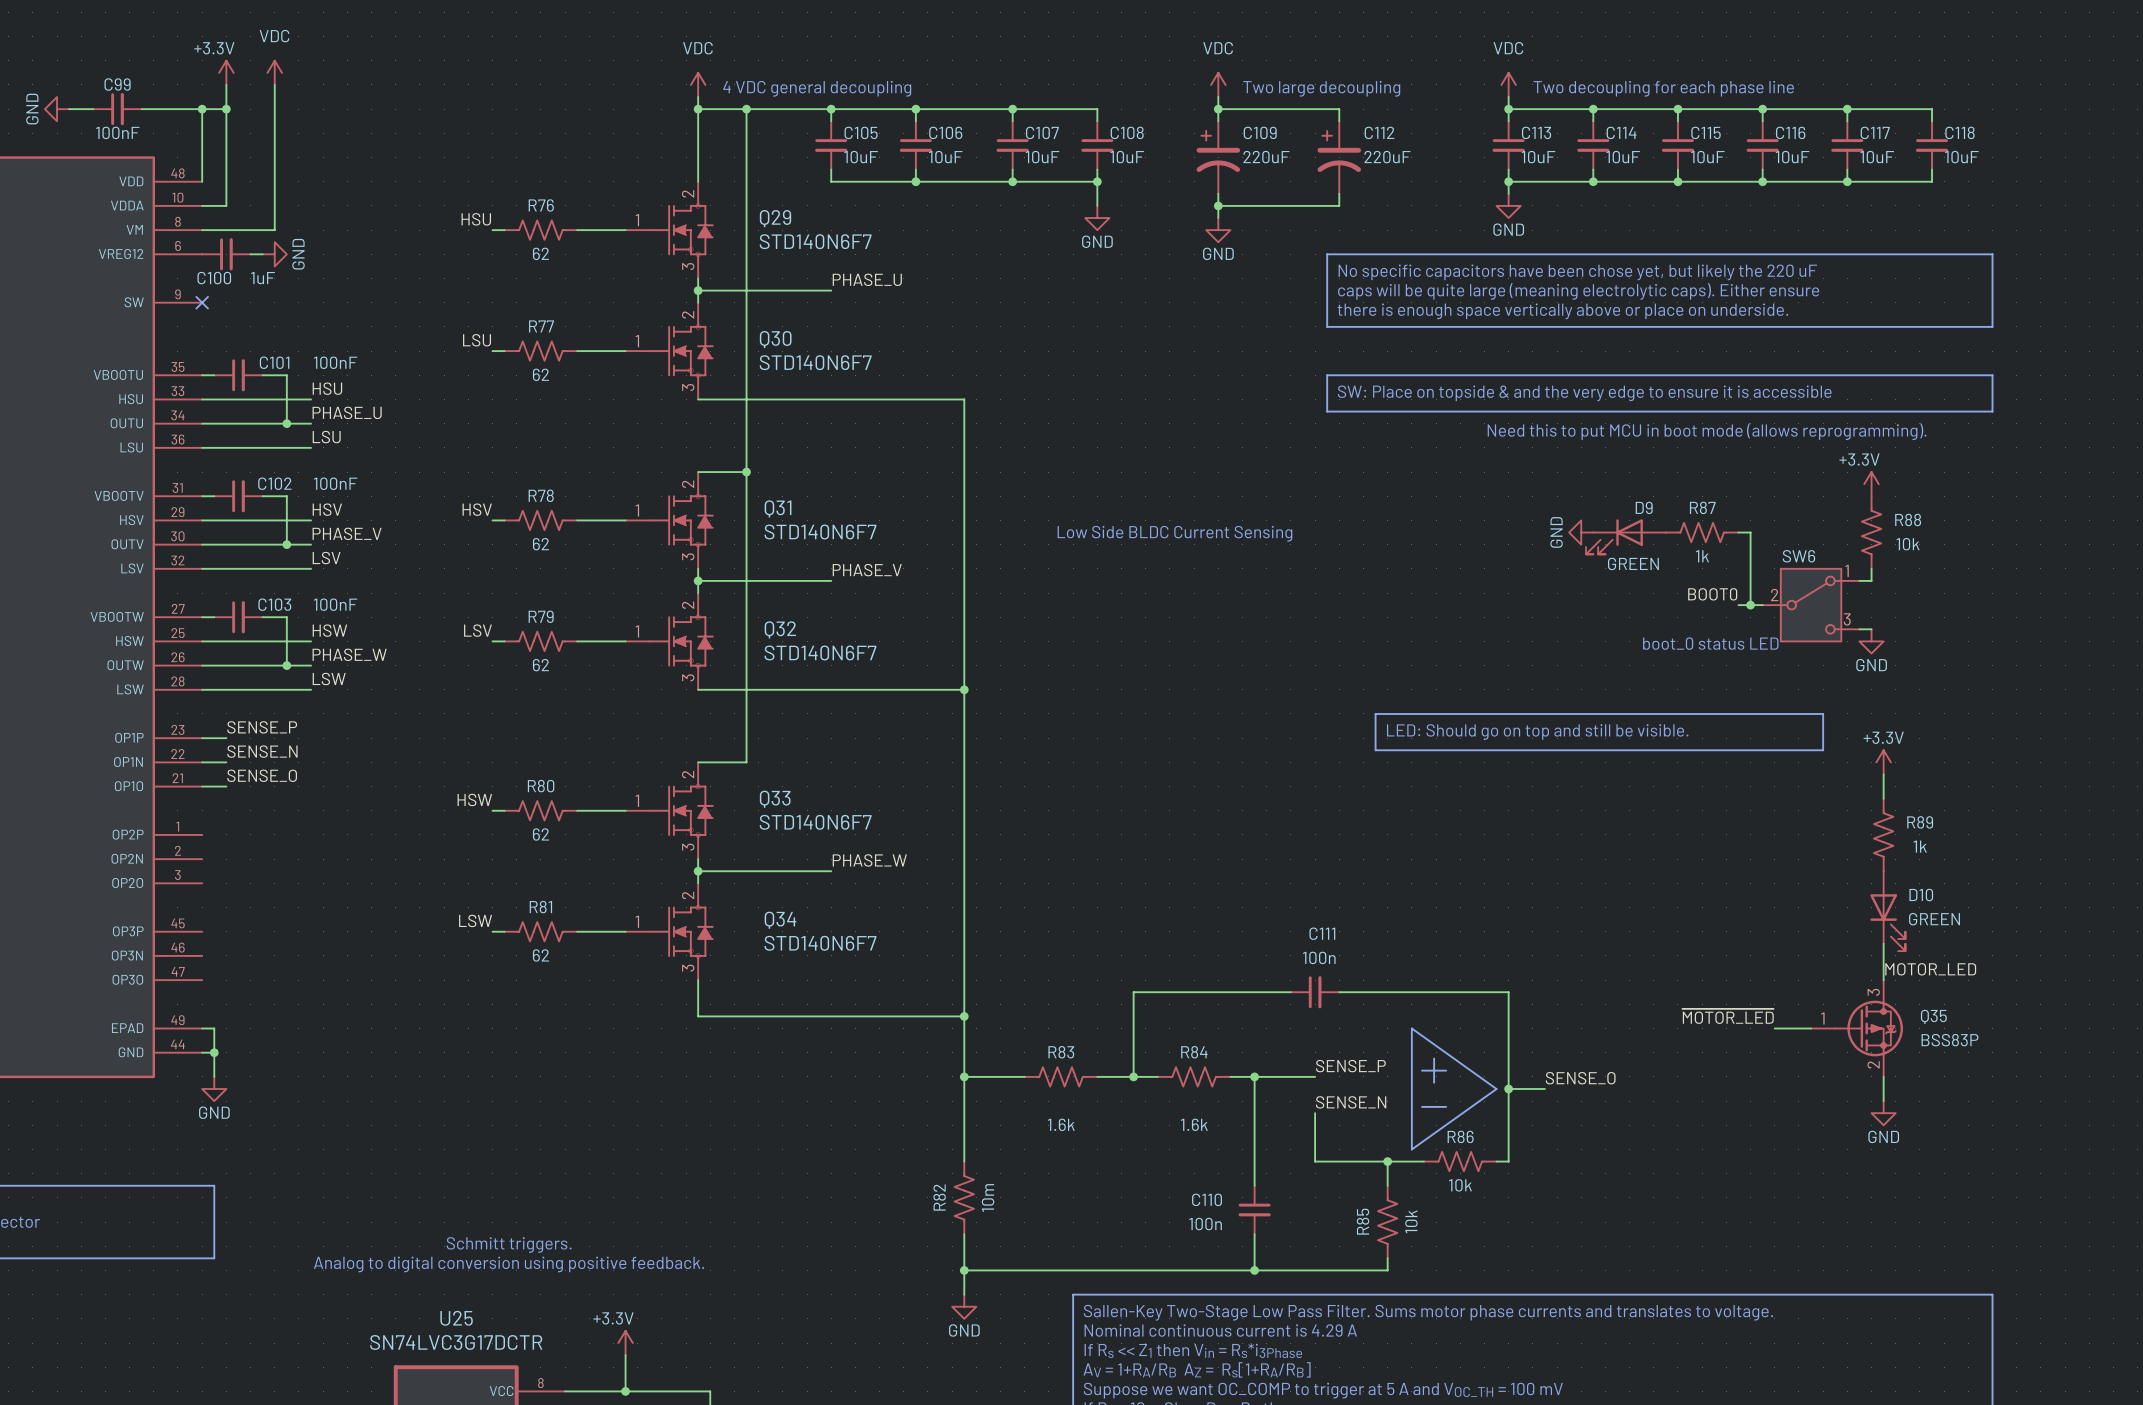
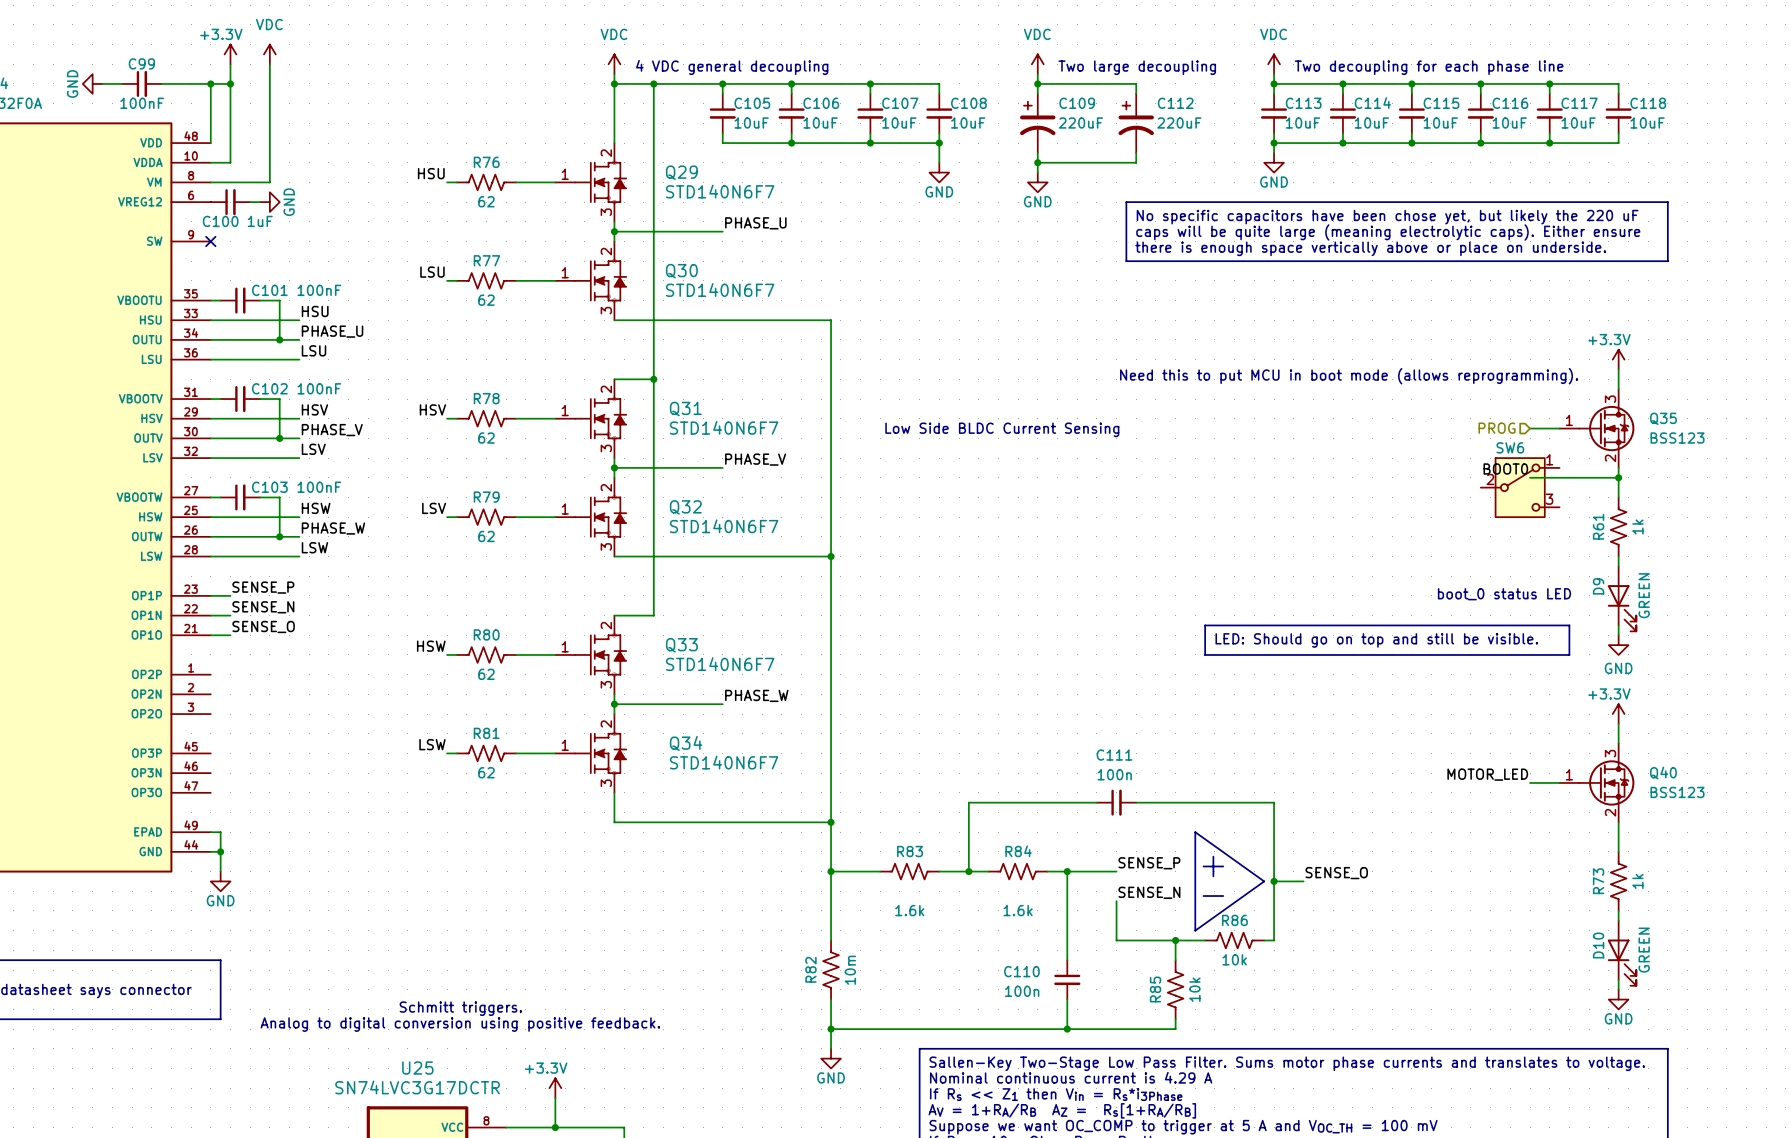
line: (1327, 375) (1992, 375) (1992, 411) (1327, 411) (1327, 375) -> none
text: SW: Place on topside & and the very edge to ensure it is accessible (1584, 393) -> none
text position: Need this to put MCU in boot mode (allows reprogramming). (1707, 431) -> Need this to put MCU in boot mode (allows reprogramming). (1349, 376)
wire: none -> (1618, 369) (1618, 389)
power symbol position: +3.3V (1871, 484) -> +3.3V (1618, 359)
power symbol: GND (1581, 532) -> none
R87: 1k (1702, 532) -> none
wire: (1738, 532) (1750, 532) (1750, 605) -> none
hierarchical label: none -> PROG (1497, 428)
wire: none -> (1530, 428) (1559, 428)
R88: 10k (1871, 532) -> none
D9 rotation: 0° (1614, 536) -> 90° counterclockwise (1622, 608)
D9 position: (1625, 536) -> (1622, 598)
wire: (1871, 568) (1871, 580) (1859, 580) -> none
wire: none -> (1618, 467) (1618, 497)
wire: none -> (1530, 477) (1618, 477)
junction: none -> (1618, 477)
label position: BOOT0 (1712, 594) -> BOOT0 (1505, 468)
wire: (1738, 605) (1762, 605) -> none
junction: (1750, 605) -> none
wire: (1859, 629) (1871, 629) -> none
power symbol: GND (1871, 641) -> none
text position: boot_0 status LED (1710, 643) -> boot_0 status LED (1504, 594)
R61: none -> 1k (1618, 527)
wire: none -> (1618, 556) (1618, 566)
line: (1375, 713) (1823, 713) (1823, 750) (1375, 750) (1375, 713) -> (1205, 625) (1569, 625) (1569, 654) (1205, 654) (1205, 625)
text position: LED: Should go on top and still be visible. (1537, 732) -> LED: Should go on top and still be visible. (1376, 640)
power symbol text position: +3.3V (1883, 737) -> +3.3V (1609, 693)
power symbol position: +3.3V (1883, 762) -> +3.3V (1618, 714)
wire: (1883, 774) (1883, 798) -> (1618, 723) (1618, 743)
wire: none -> (1618, 625) (1618, 635)
power symbol: none -> GND (1618, 645)
R89: 1k (1883, 834) -> none
D10 name rotation: 0° (1921, 895) -> 90° counterclockwise (1598, 945)
D10 name position: D10 (1921, 895) -> D10 (1598, 945)
D10 position: (1887, 911) -> (1622, 953)
D10 value rotation: 0° (1934, 919) -> 90° counterclockwise (1644, 950)
wire: (1883, 943) (1883, 980) -> (1618, 822) (1618, 851)
Q40: none -> BSS123 (1596, 782)
label position: MOTOR_LED (1930, 969) -> MOTOR_LED (1487, 774)
Q35 symbol: [1811, 980, 1903, 1077] -> [1559, 389, 1635, 468]
label: ~{MOTOR_LED} (1728, 1016) -> none
wire: (1774, 1028) (1811, 1028) -> (1530, 782) (1559, 782)
Q35 value: BSS83P (1950, 1040) -> BSS123 (1677, 438)
wire: (1883, 1076) (1883, 1101) -> none
R73: none -> 1k (1618, 881)
power symbol position: GND (1883, 1113) -> GND (1618, 999)
wire: none -> (1618, 910) (1618, 920)
wire: none -> (1618, 979) (1618, 989)

